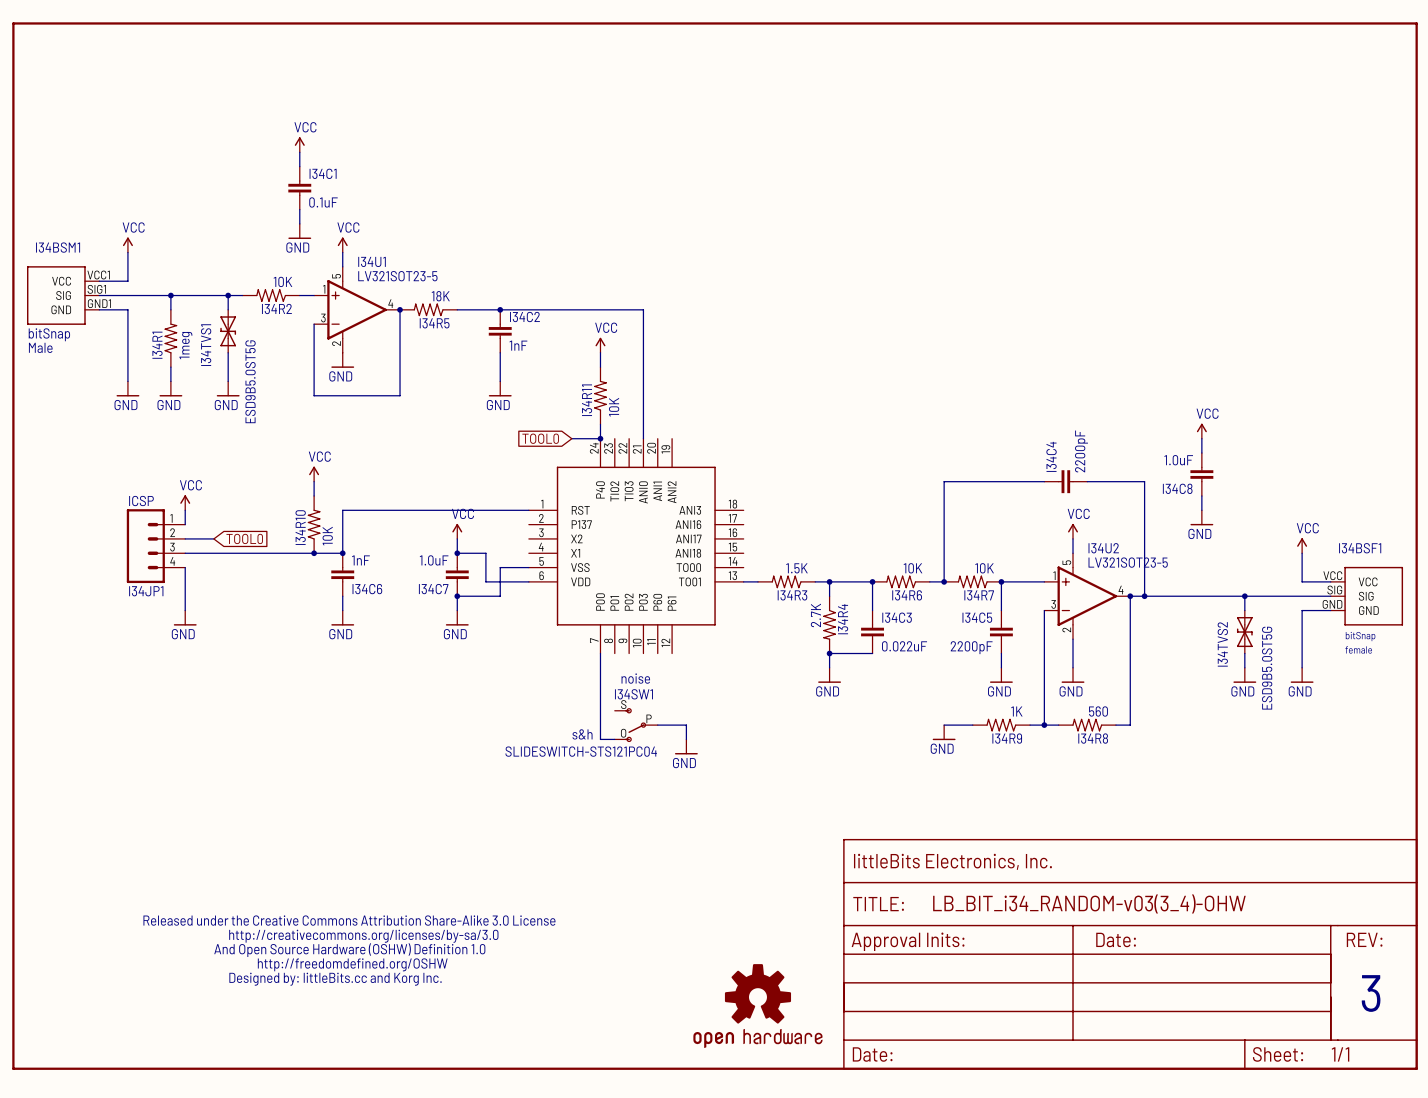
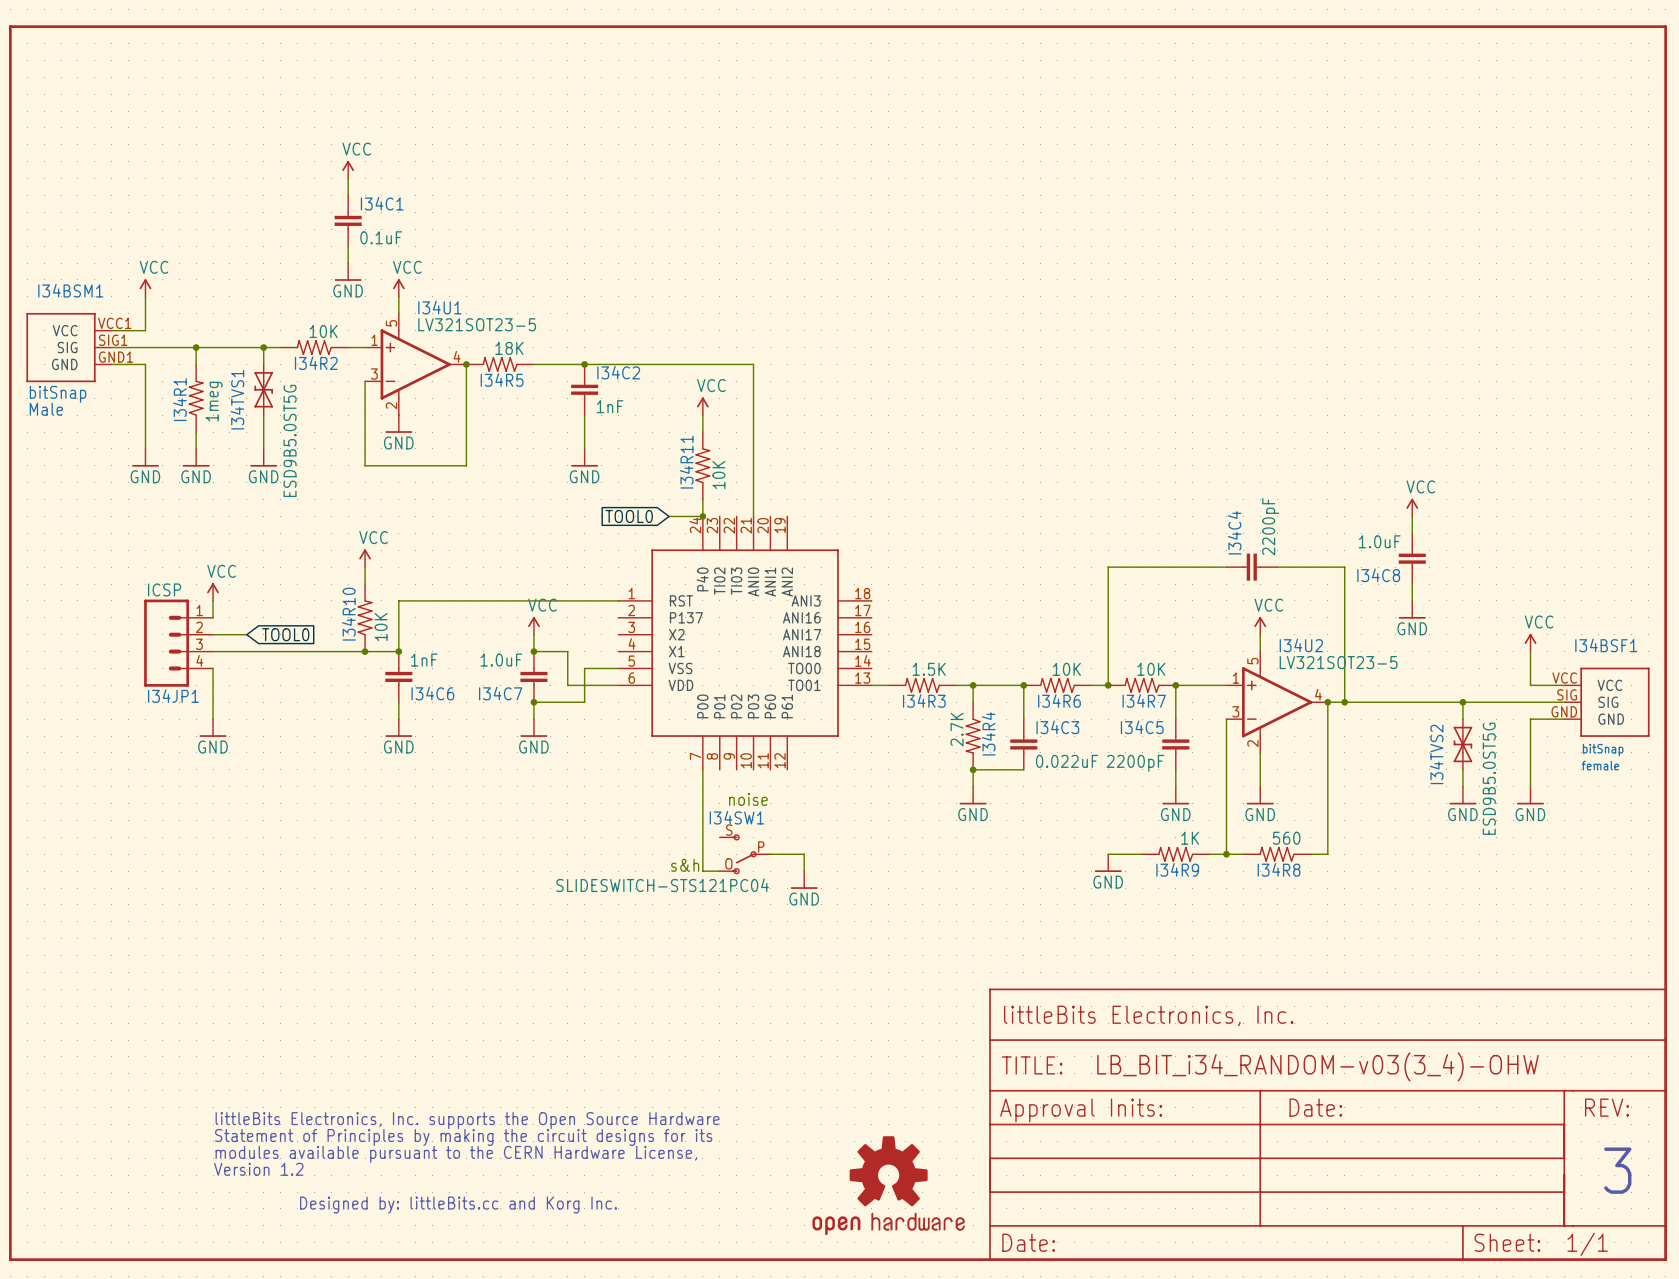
part: (349, 950) -> none
part: none -> (466, 1162)

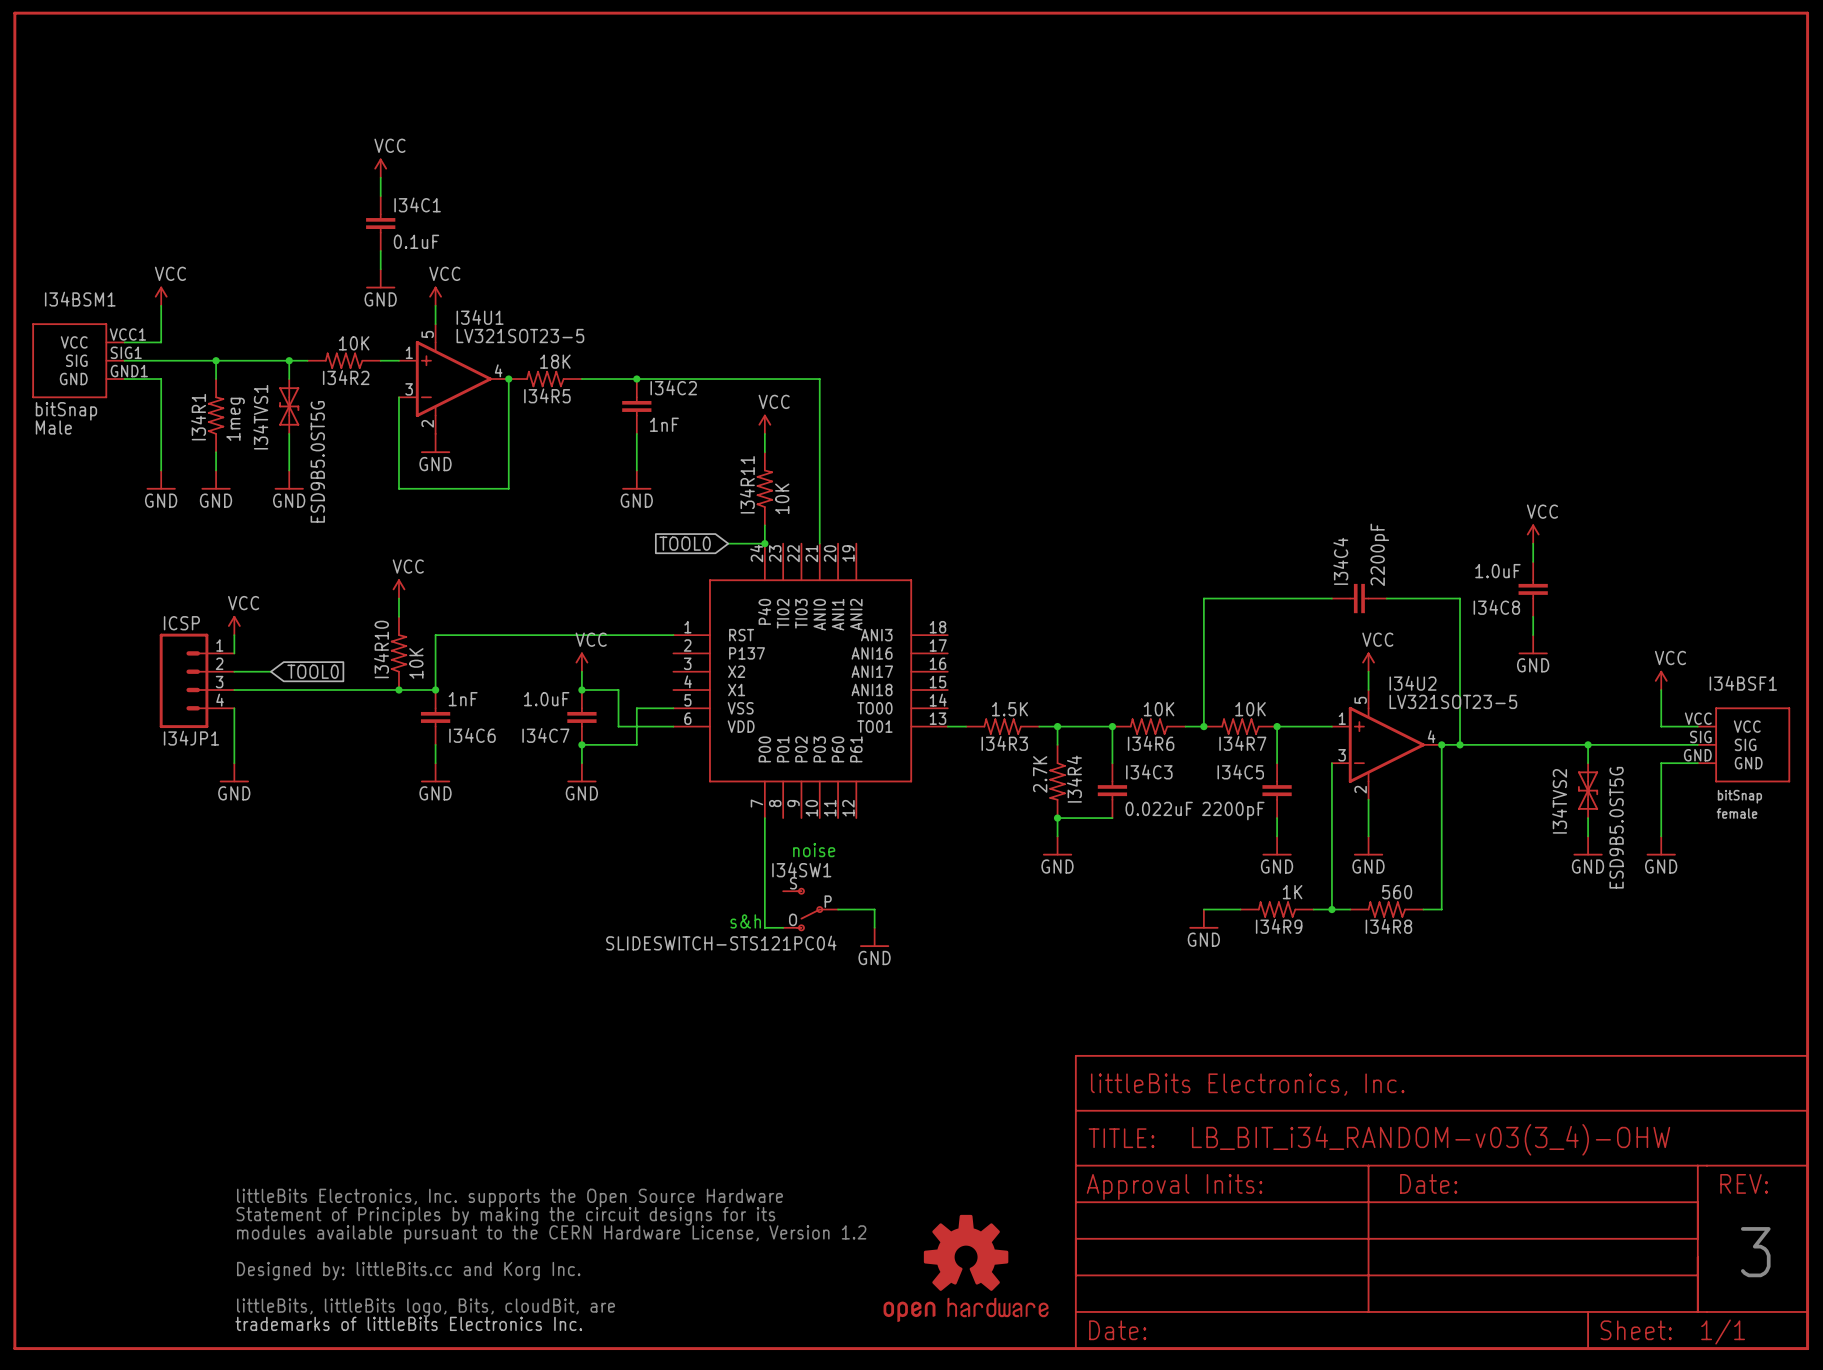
part: (466, 1162) -> none
part: none -> (550, 1259)

